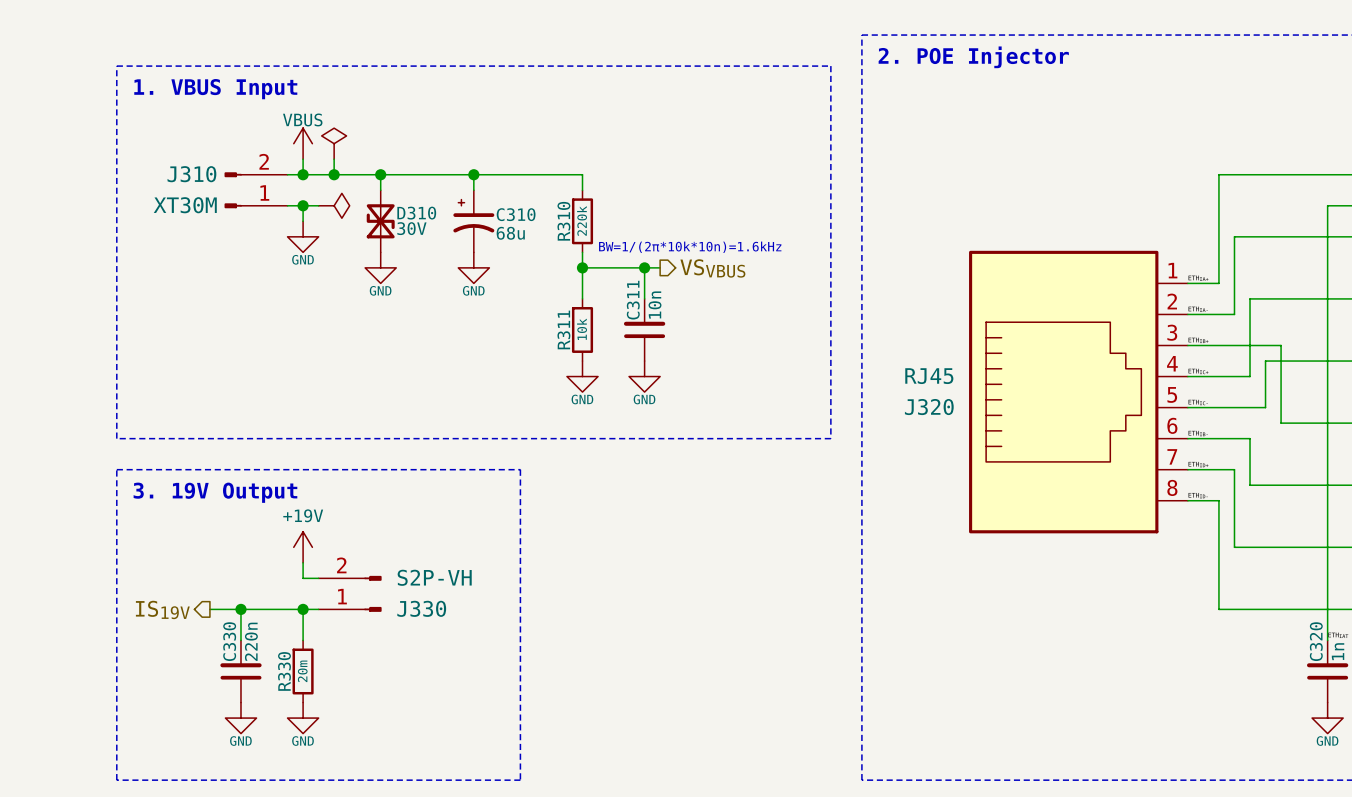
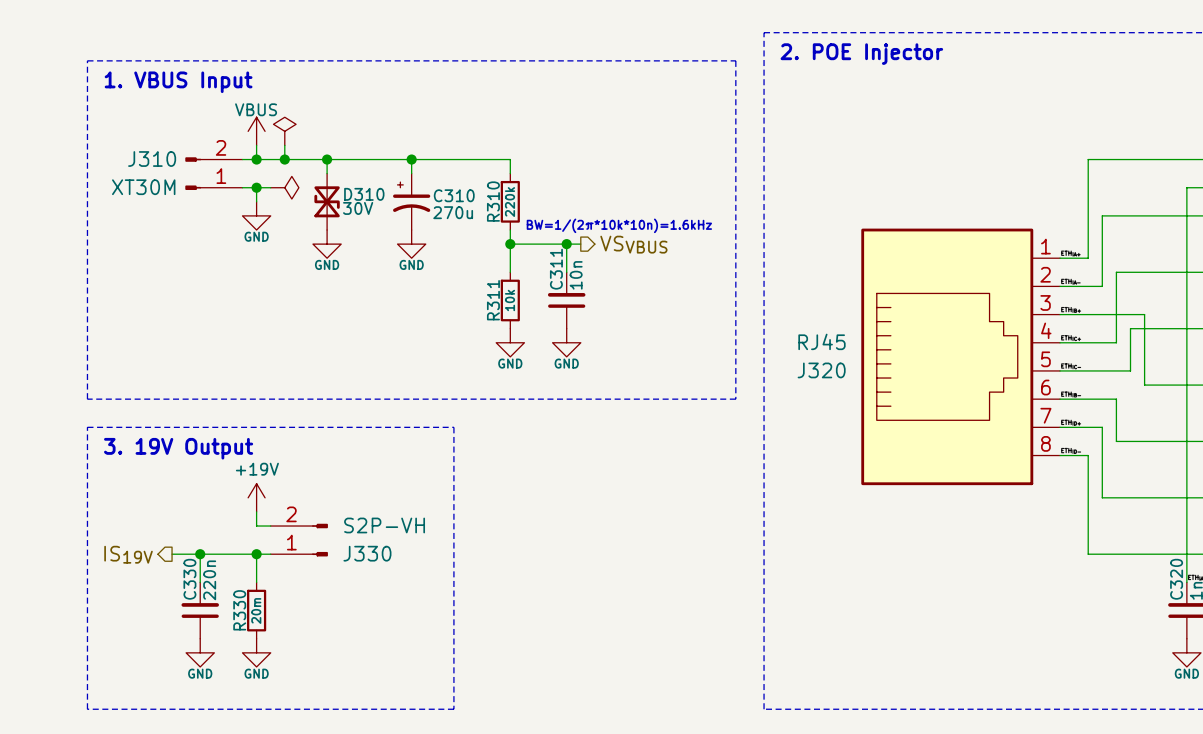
C310 value: 68u (510, 233) -> 270u (453, 212)

